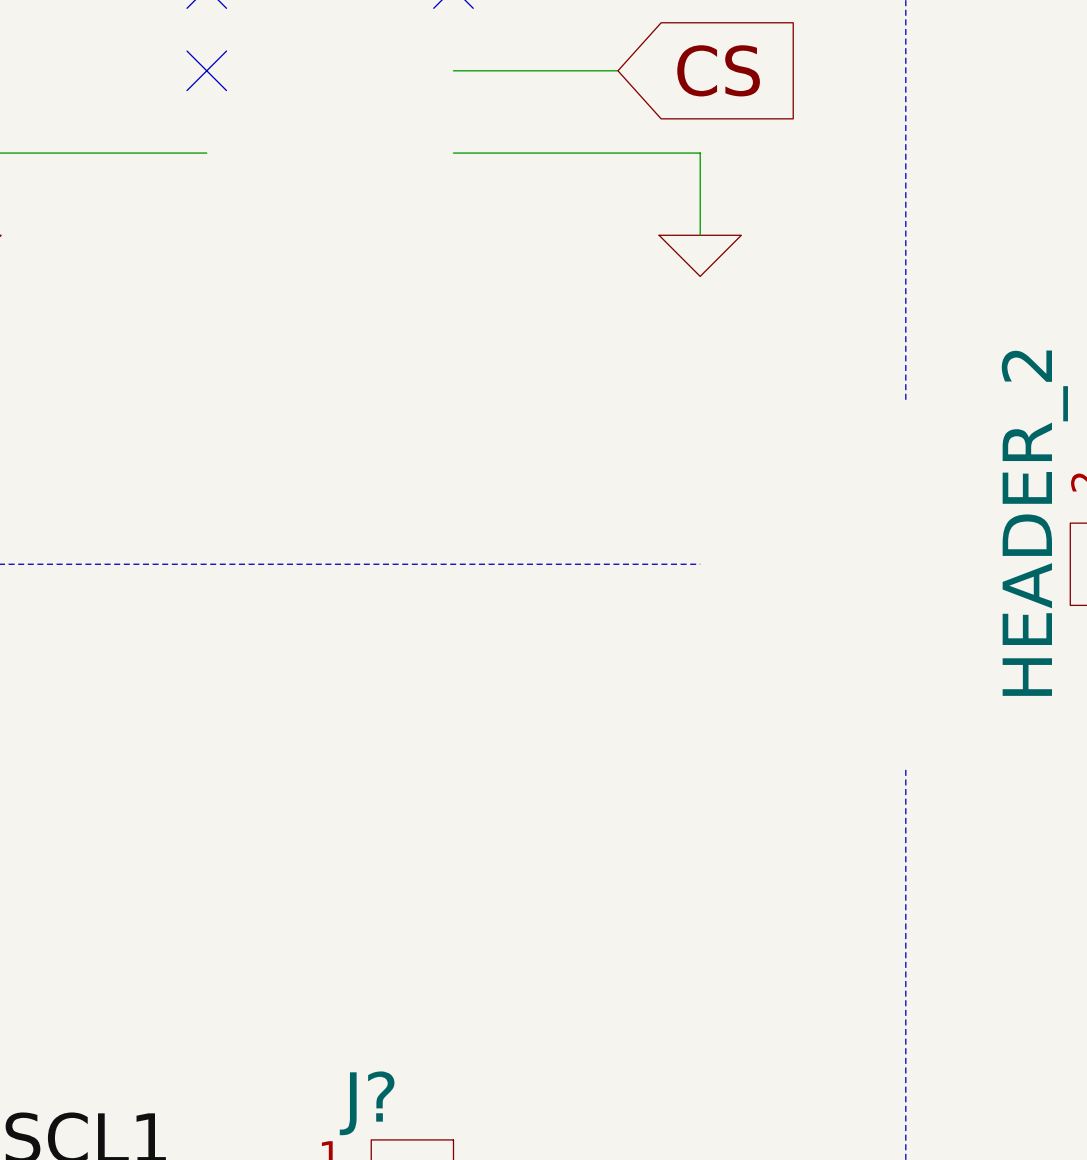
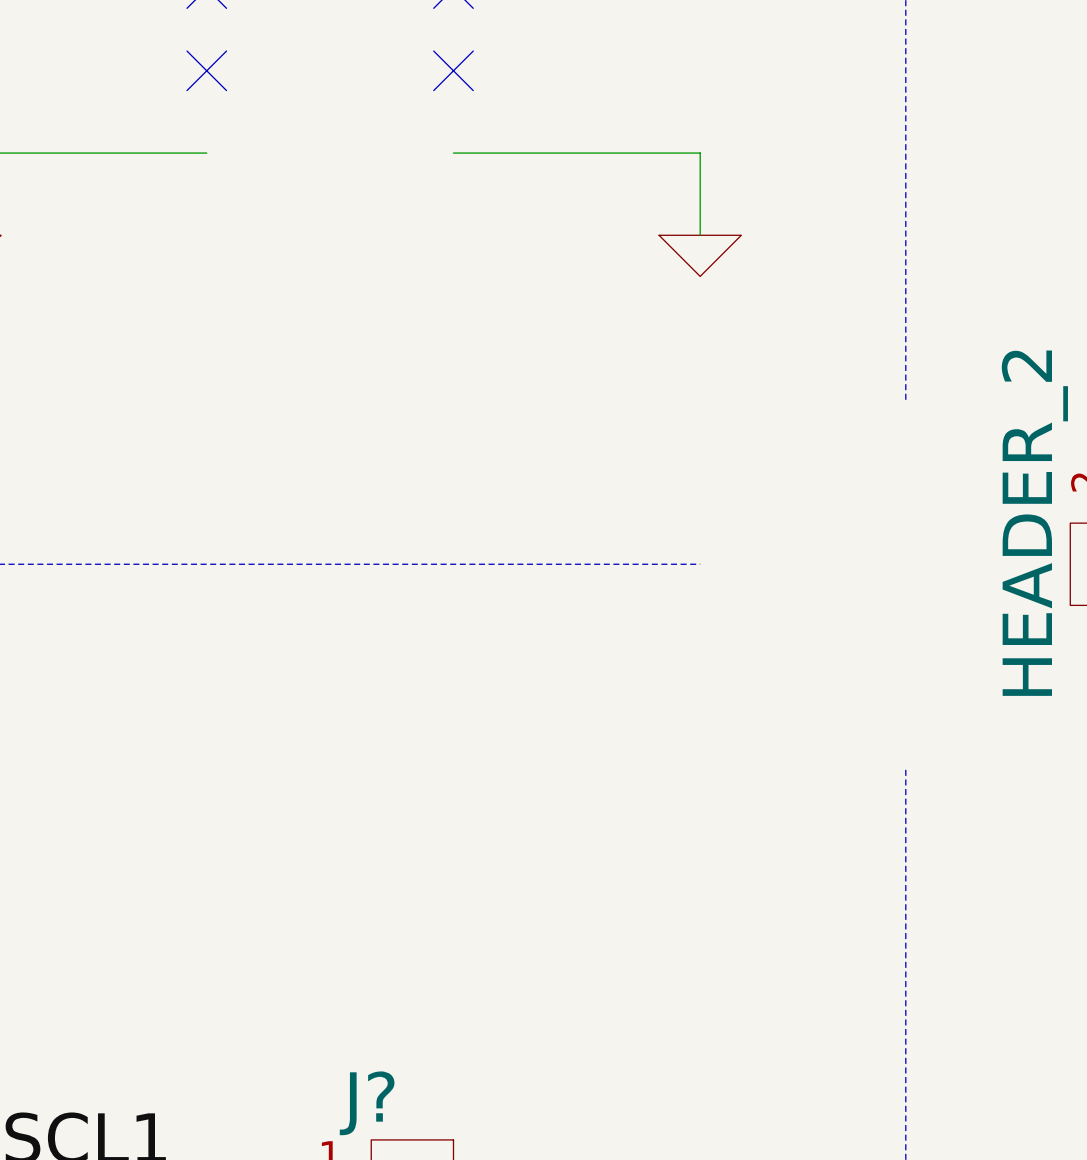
wire: (453, 70) (617, 70) -> none
no-connect mark: none -> (453, 70)
global label: CS (718, 70) -> none

